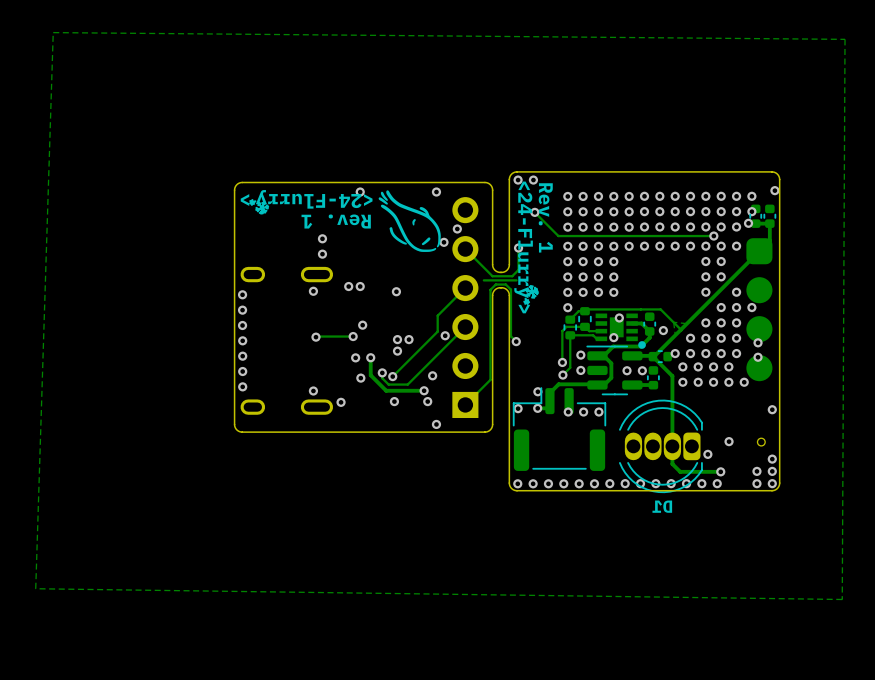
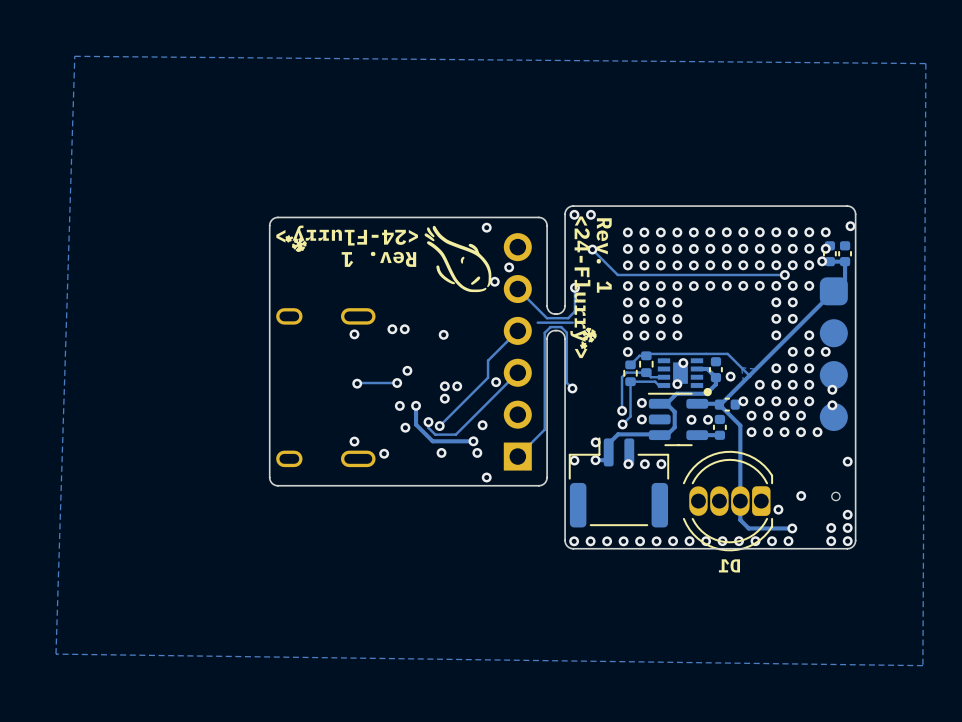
via: (360, 192) -> none
via: (322, 238) -> none
via: (322, 254) -> none
via: (242, 294) -> none
via: (242, 310) -> none
via: (242, 325) -> none
via: (242, 340) -> none
via: (242, 356) -> none
via: (242, 371) -> none
via: (242, 386) -> none

